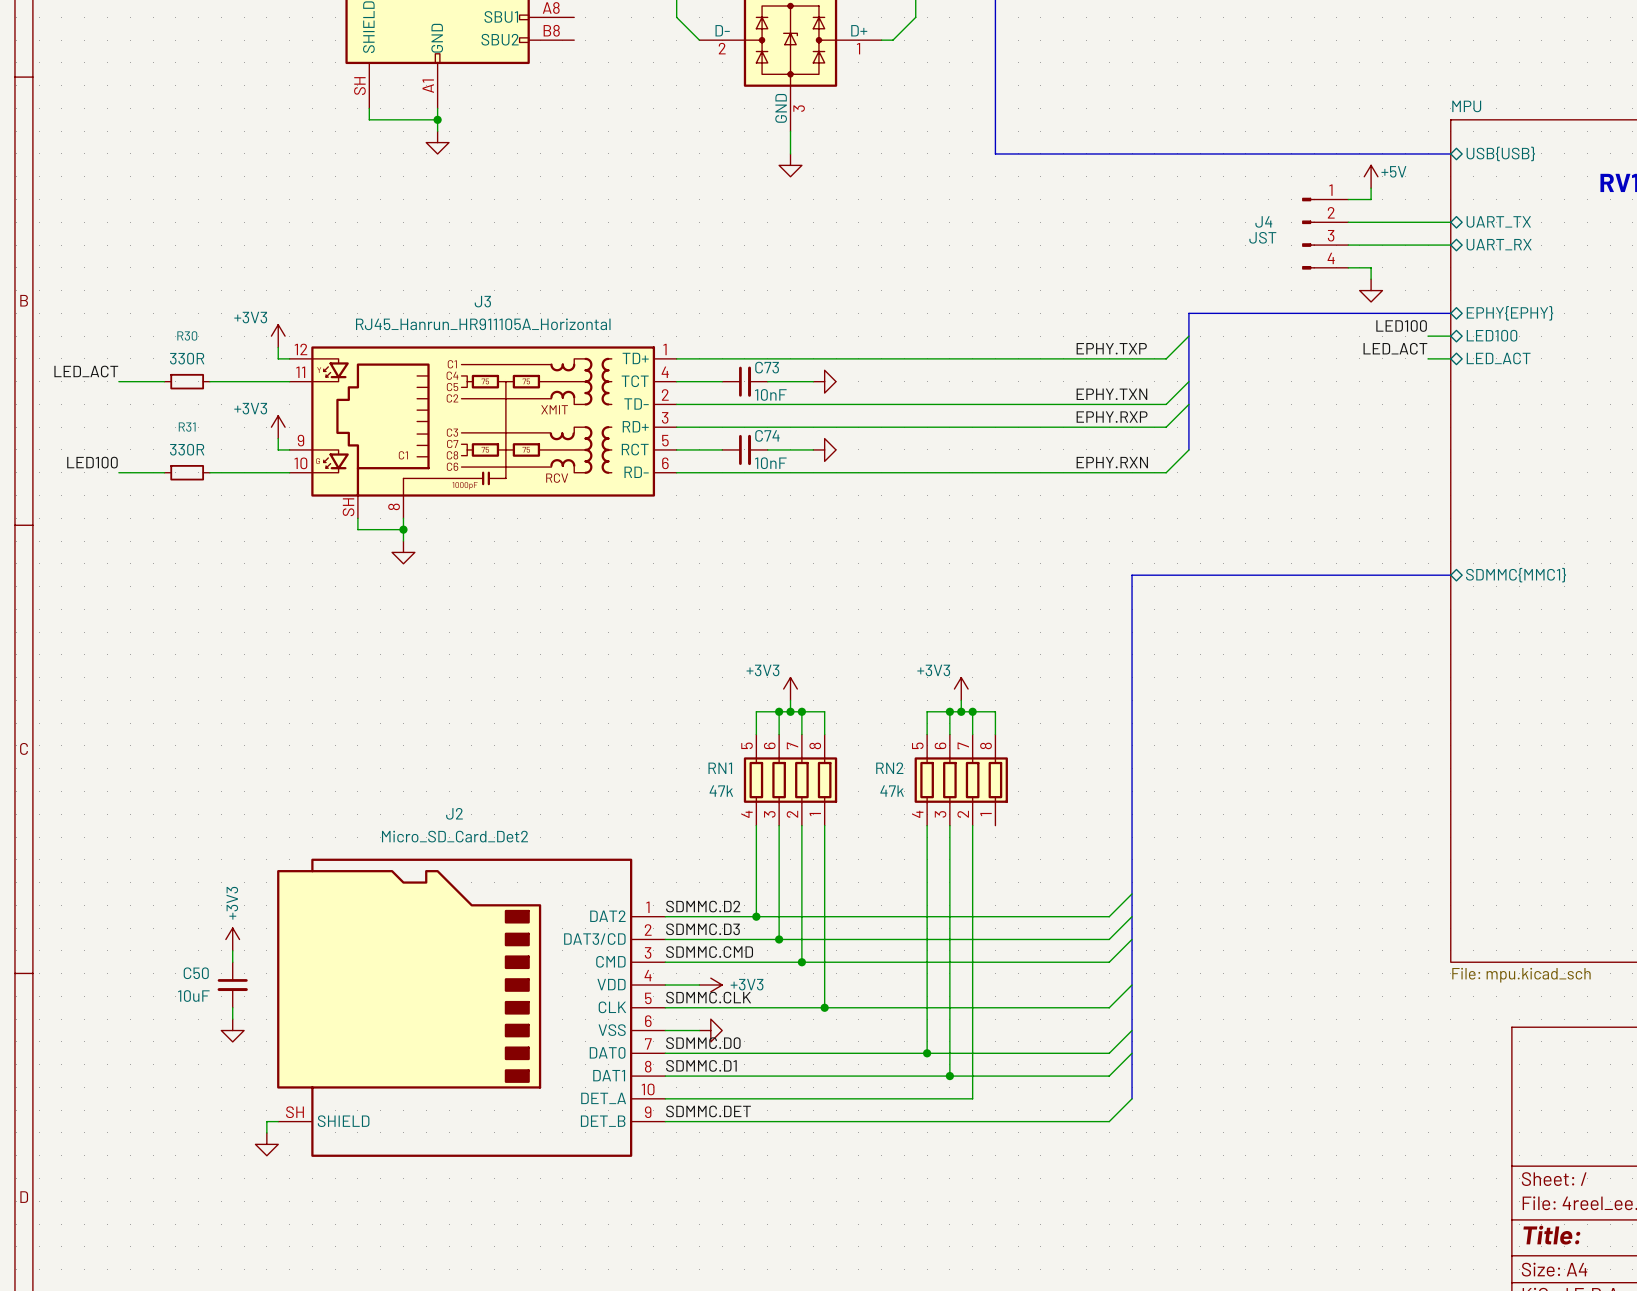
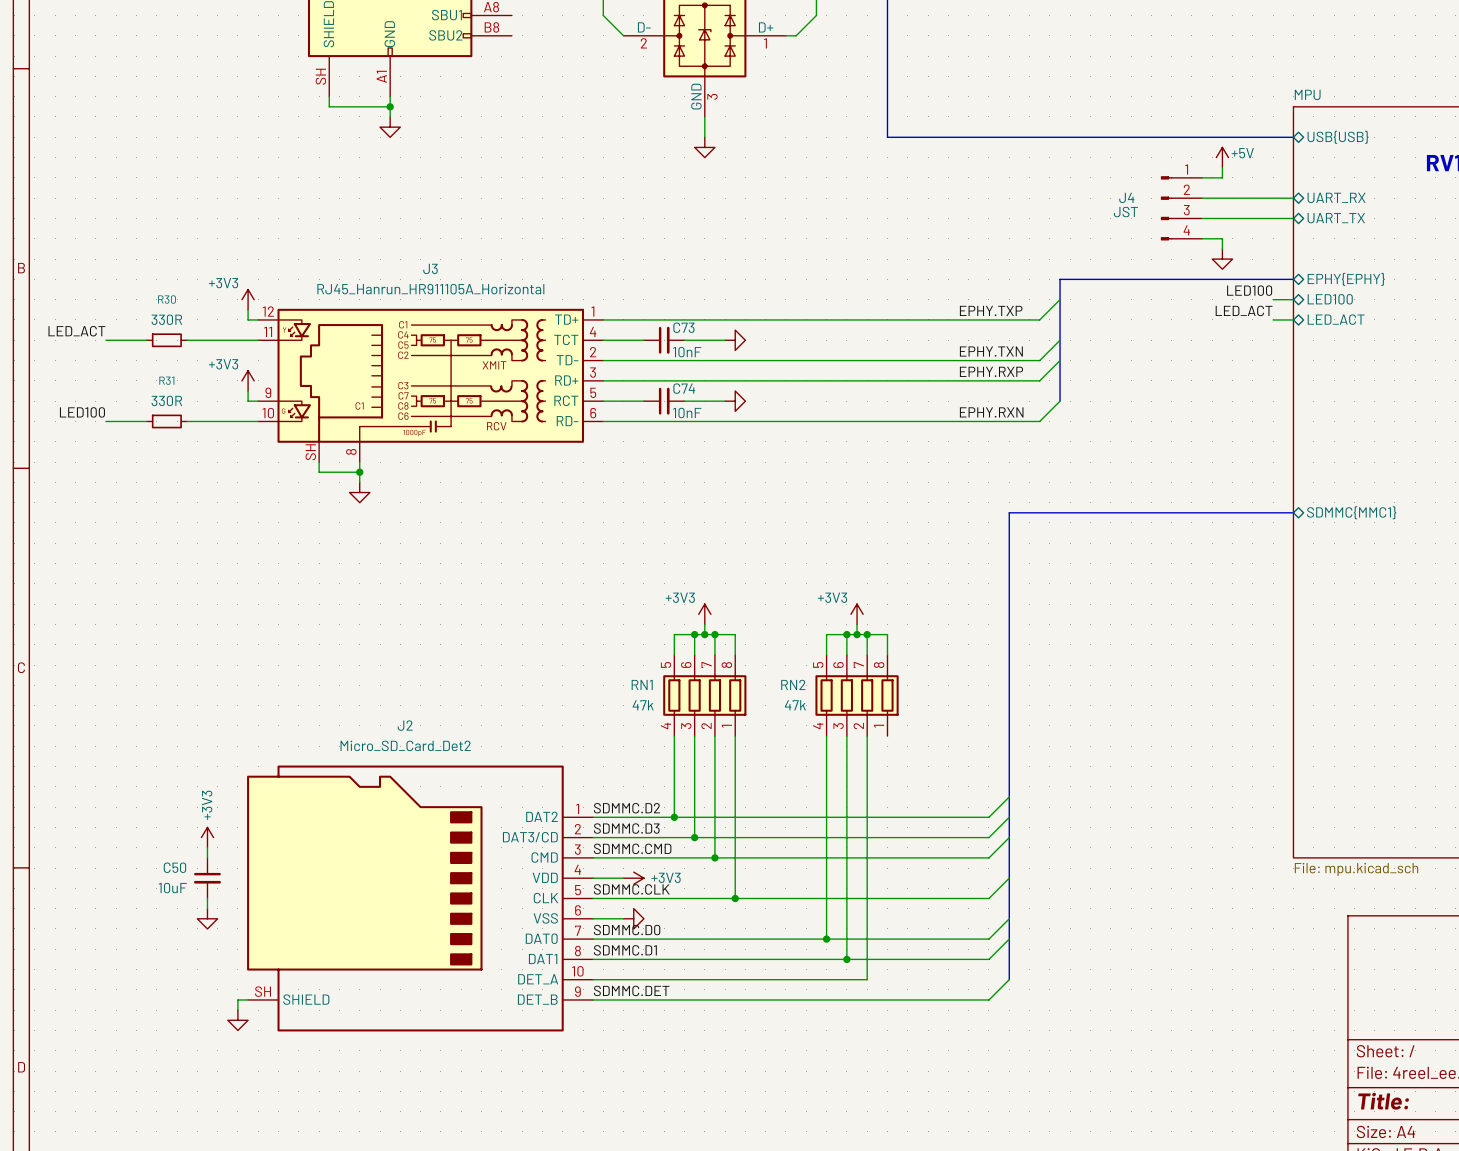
sheet pin: UART_TX (1498, 221) -> UART_RX (1336, 197)
sheet pin: UART_RX (1499, 244) -> UART_TX (1336, 218)

